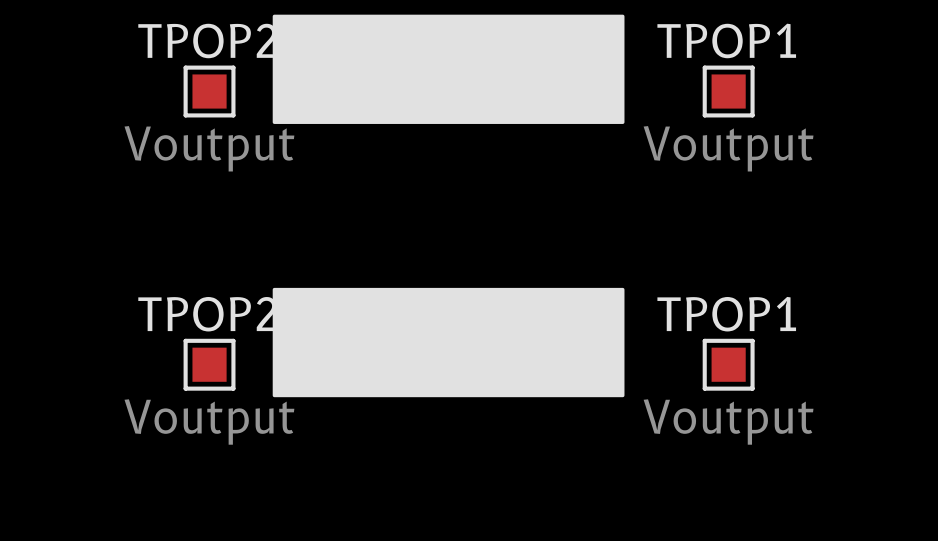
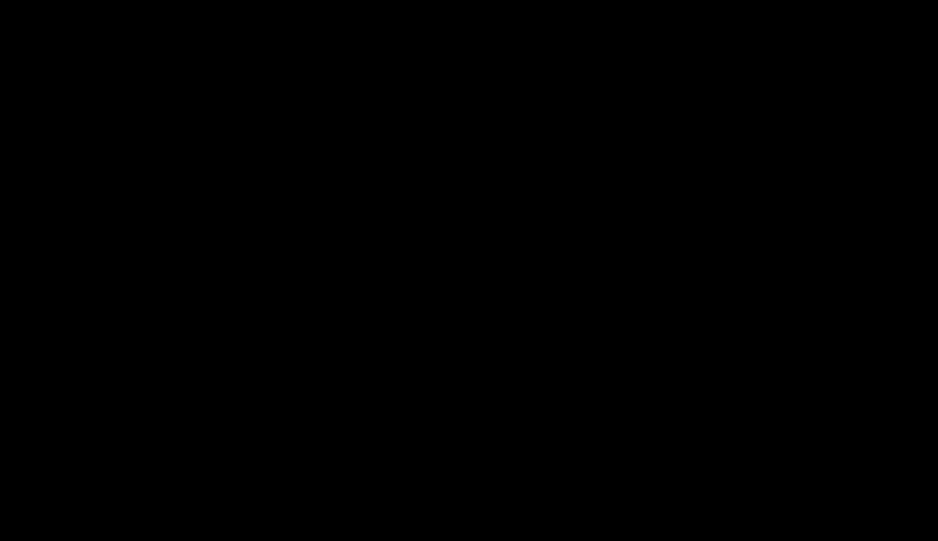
drawing: [272, 14, 625, 124] -> none
TPOP2: Voutput (209, 91) -> none
TPOP1: Voutput (728, 91) -> none
drawing: [272, 287, 625, 398] -> none
TPOP2: Voutput (209, 364) -> none
TPOP1: Voutput (728, 364) -> none

